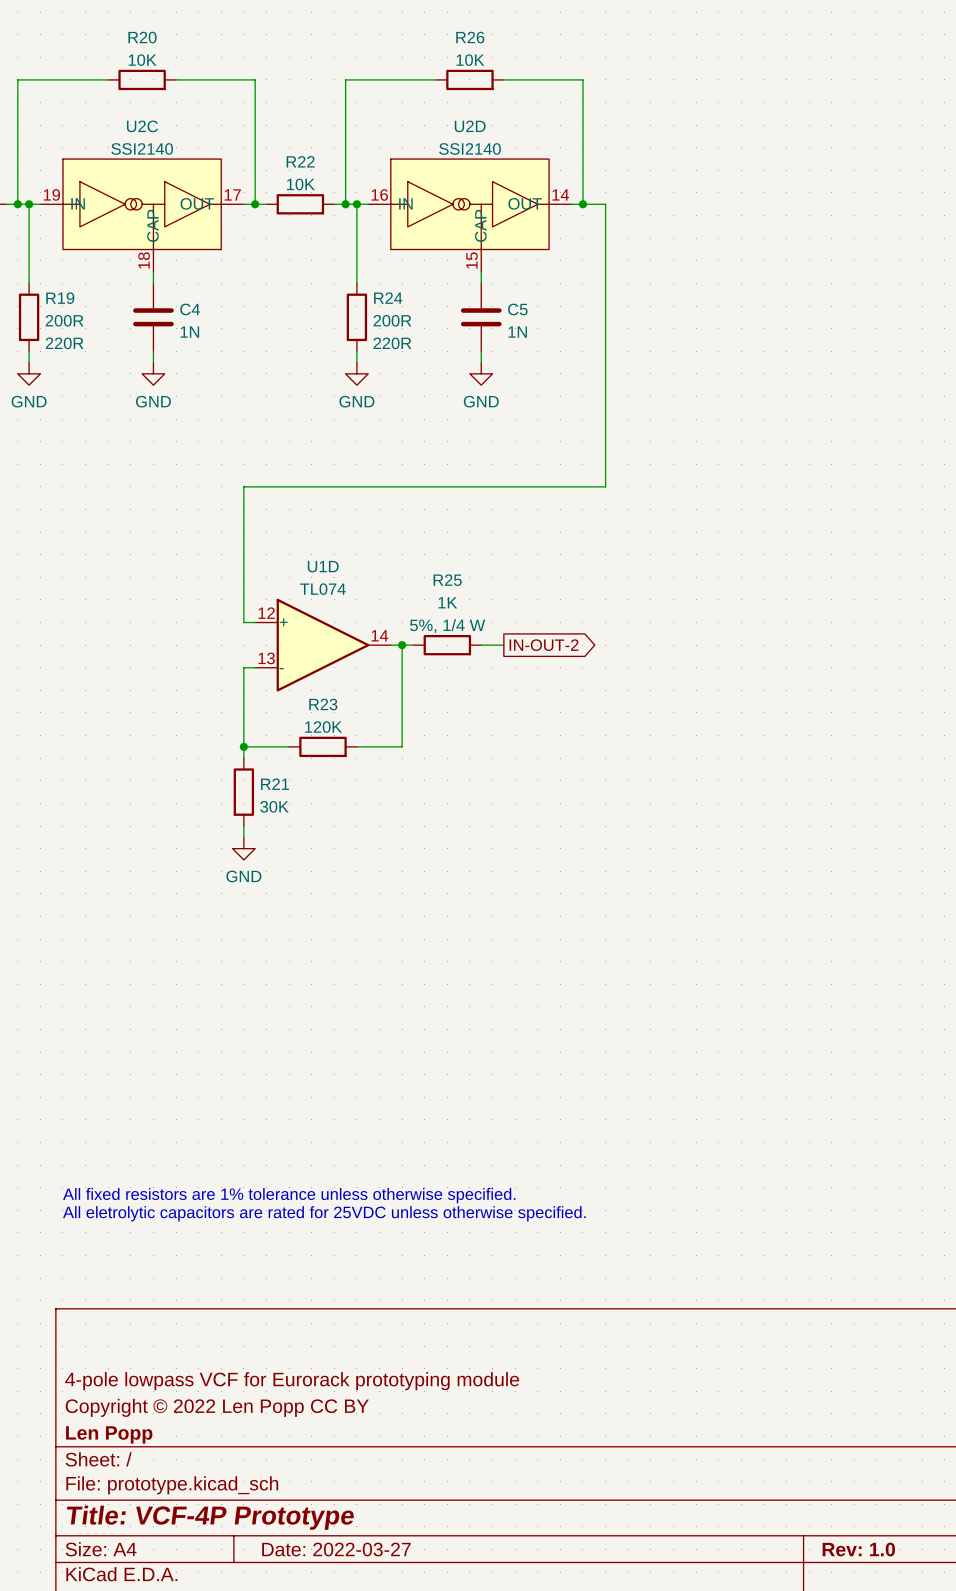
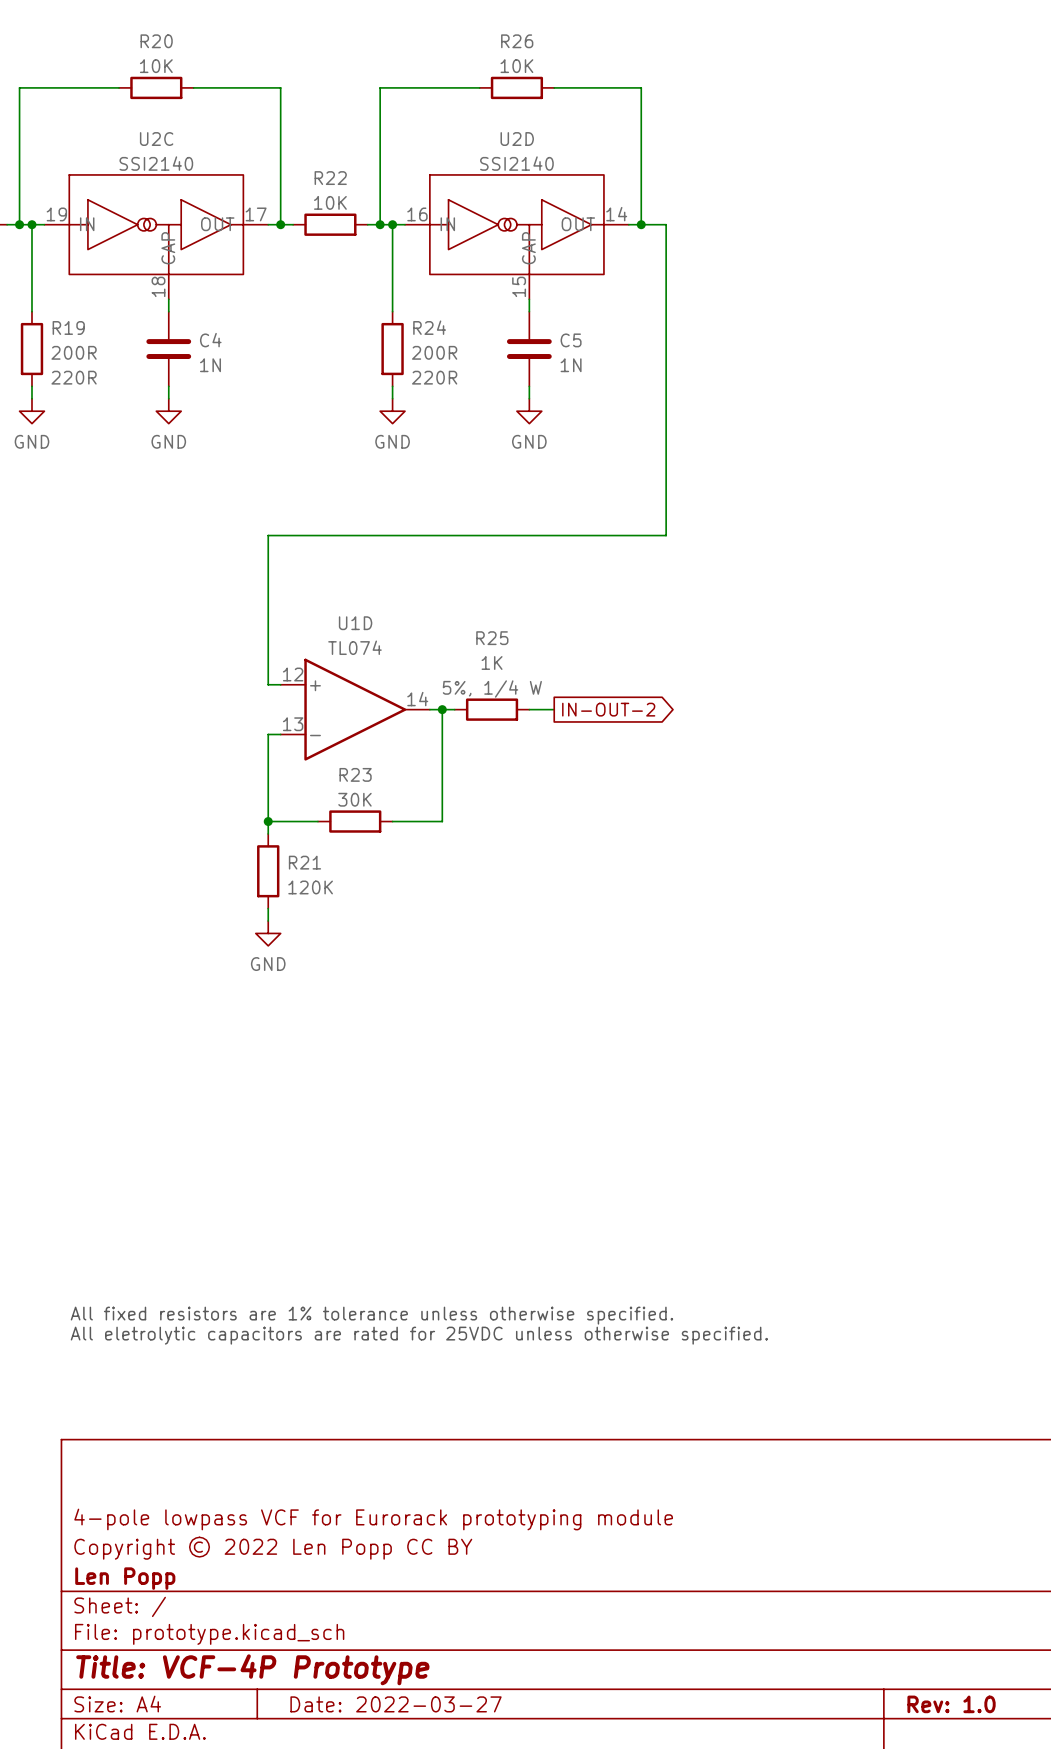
R23 value: 120K (323, 727) -> 30K (354, 799)
R21 value: 30K (274, 806) -> 120K (310, 887)

